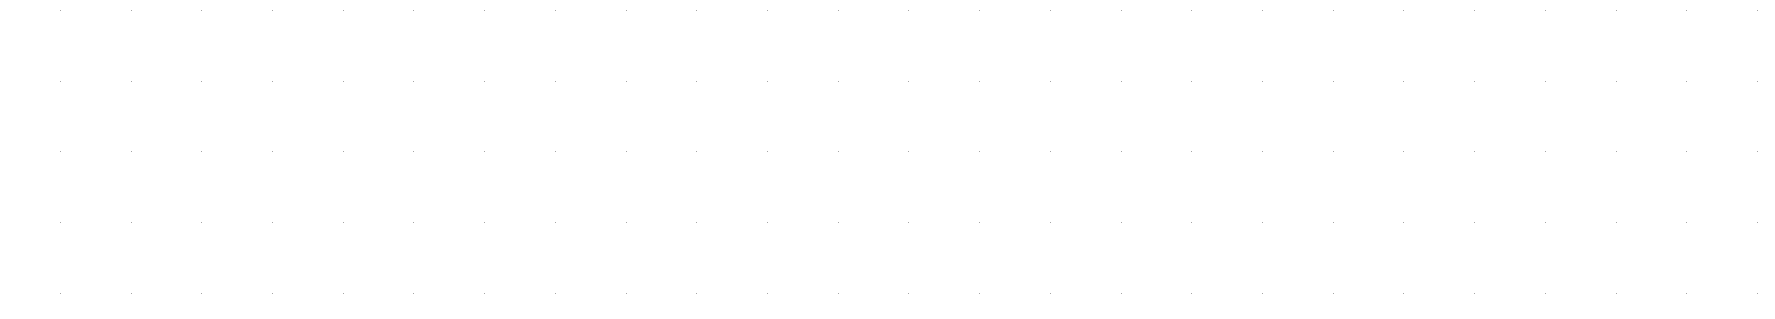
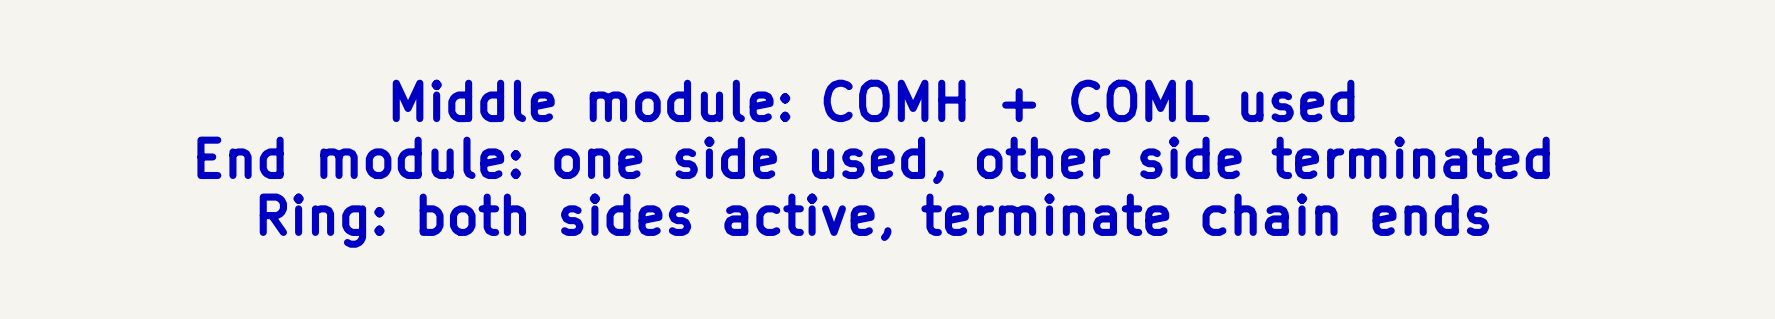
text: none -> Middle module: COMH + COML used (873, 100)
text: none -> End module: one side used, other side terminated (873, 160)
text: none -> Ring: both sides active, terminate chain ends (874, 220)

